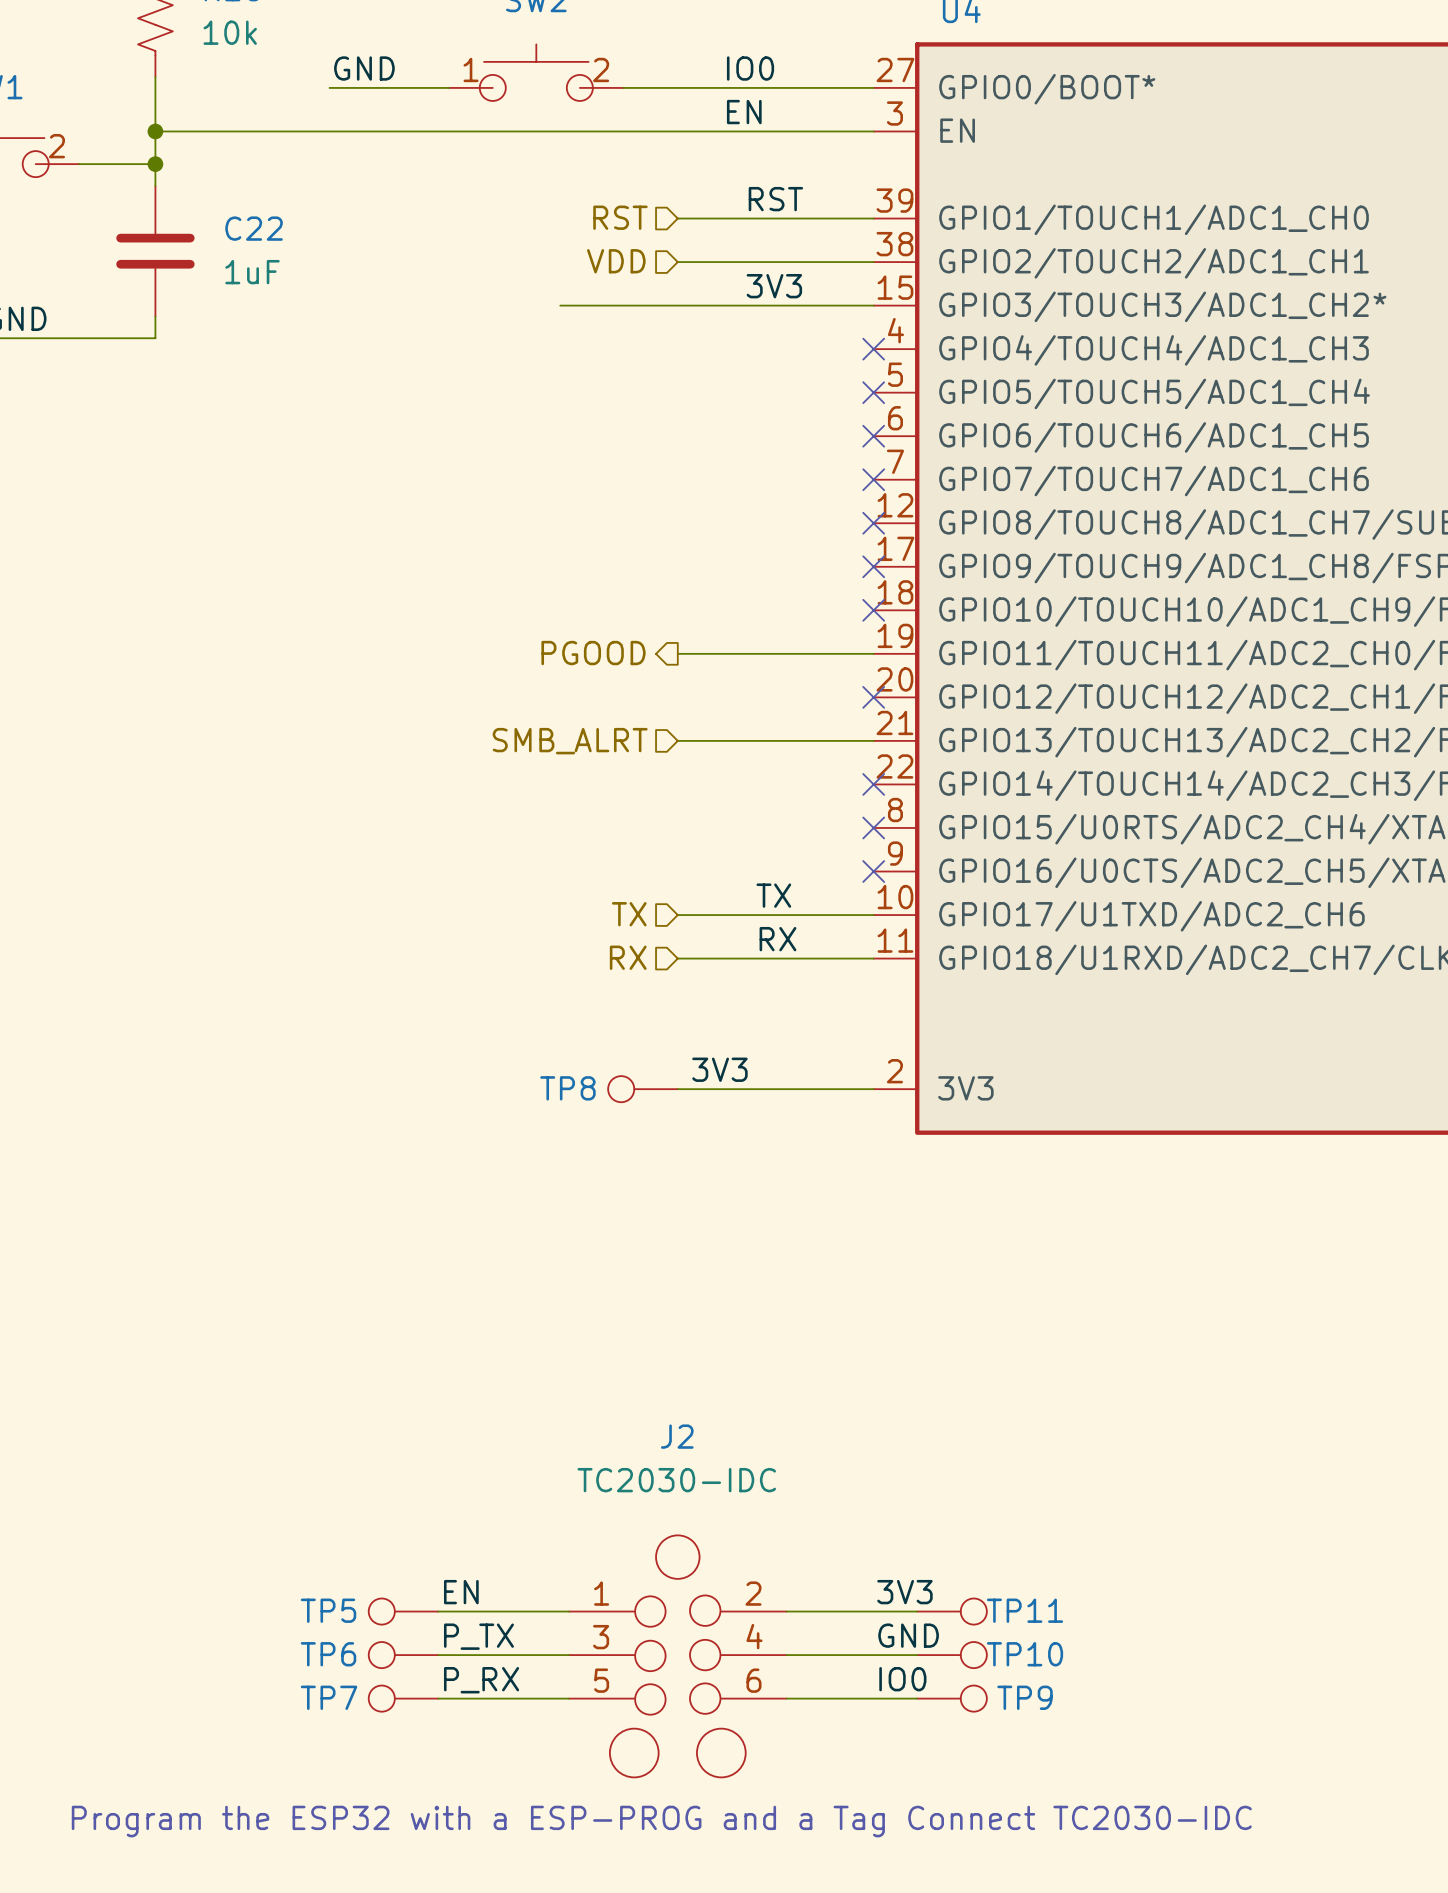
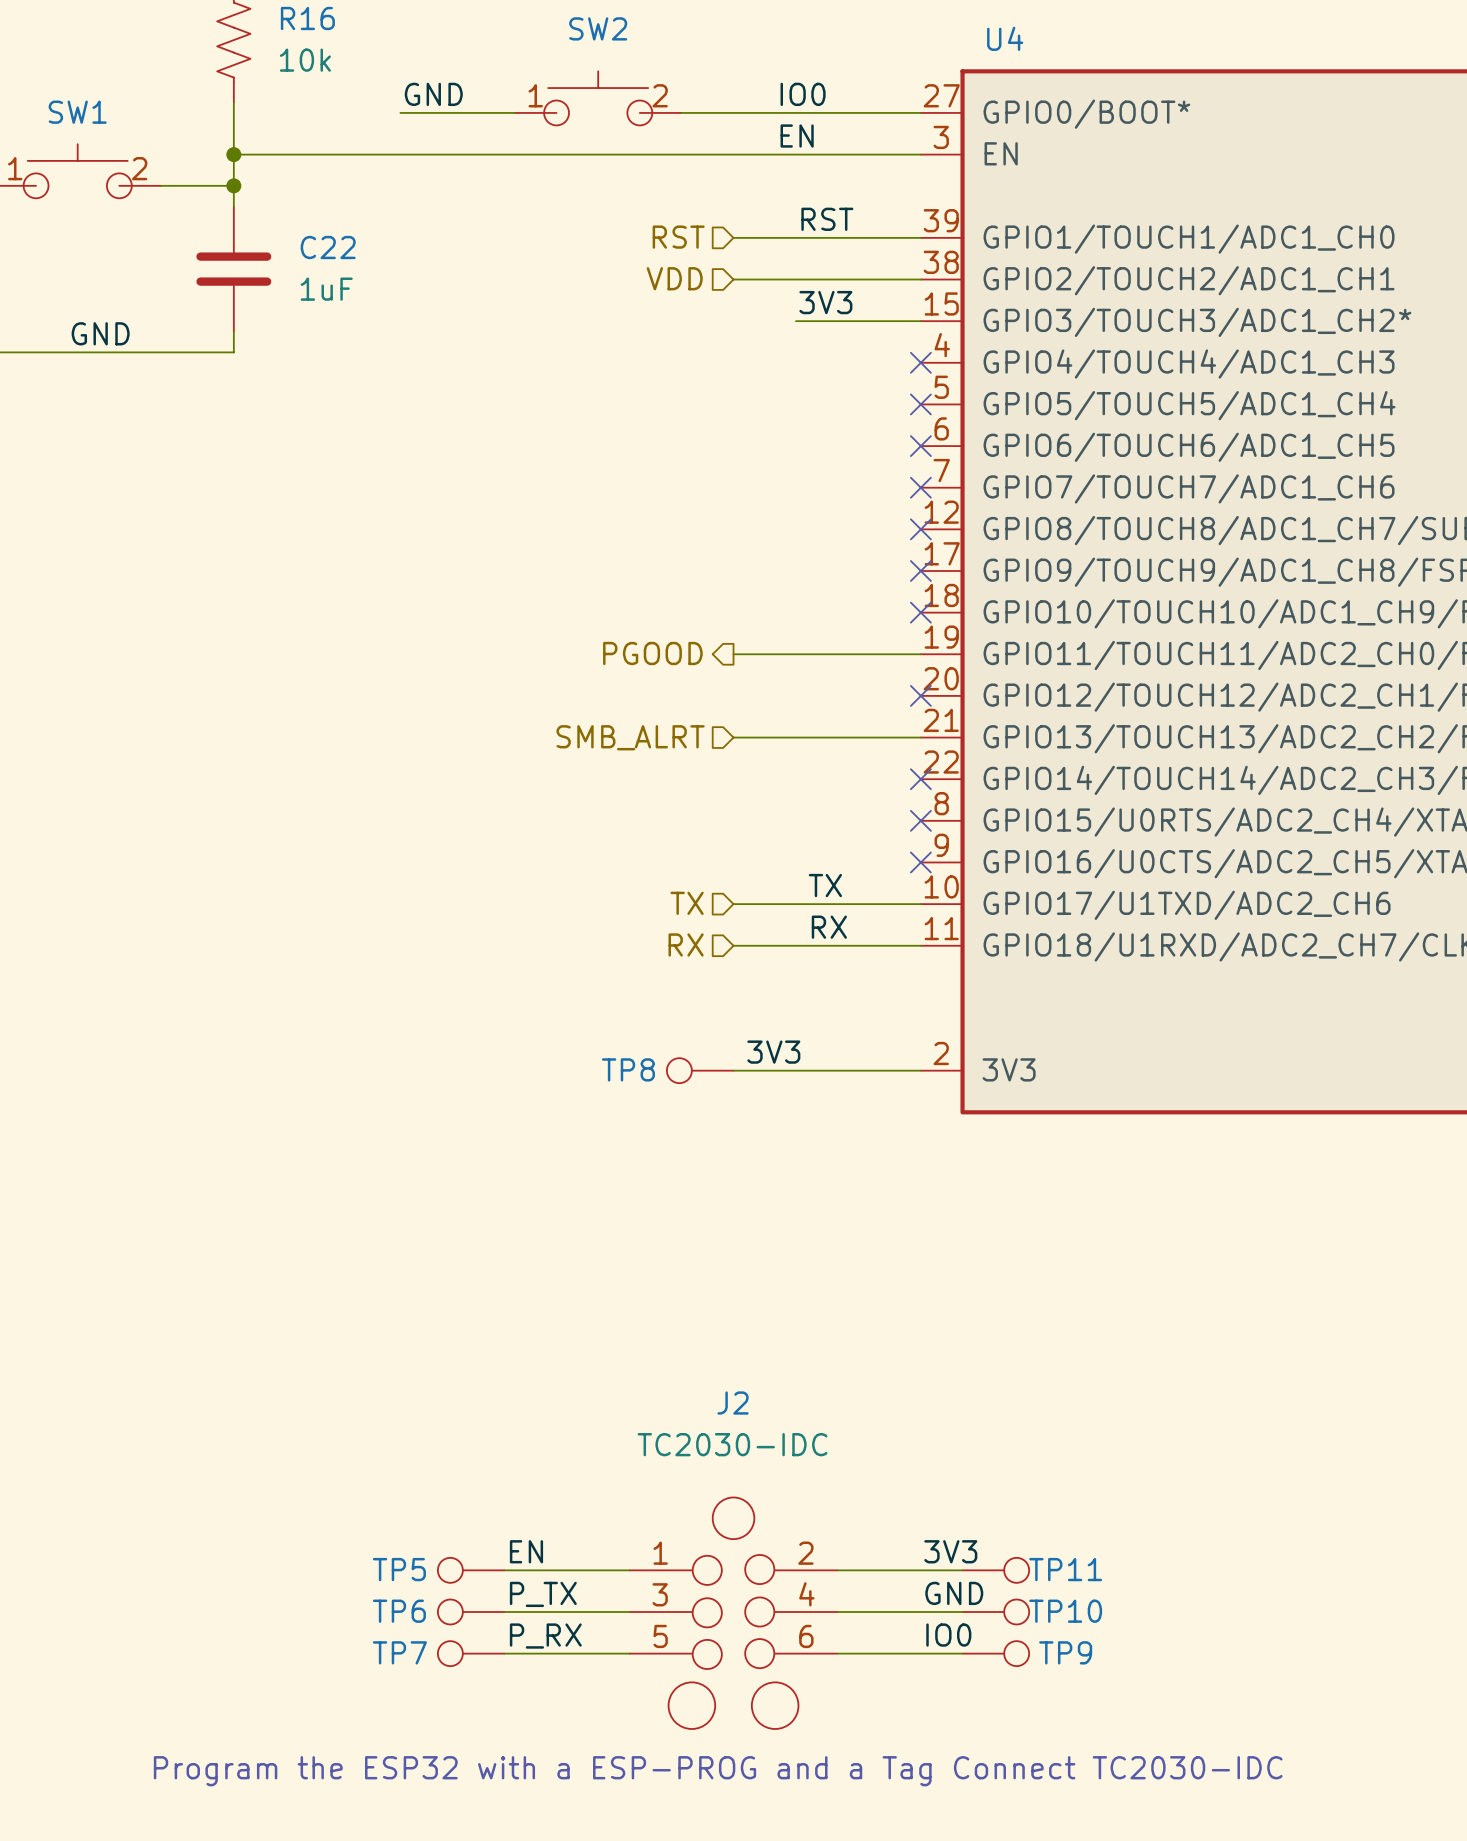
wire: (560, 305) (743, 305) -> none

